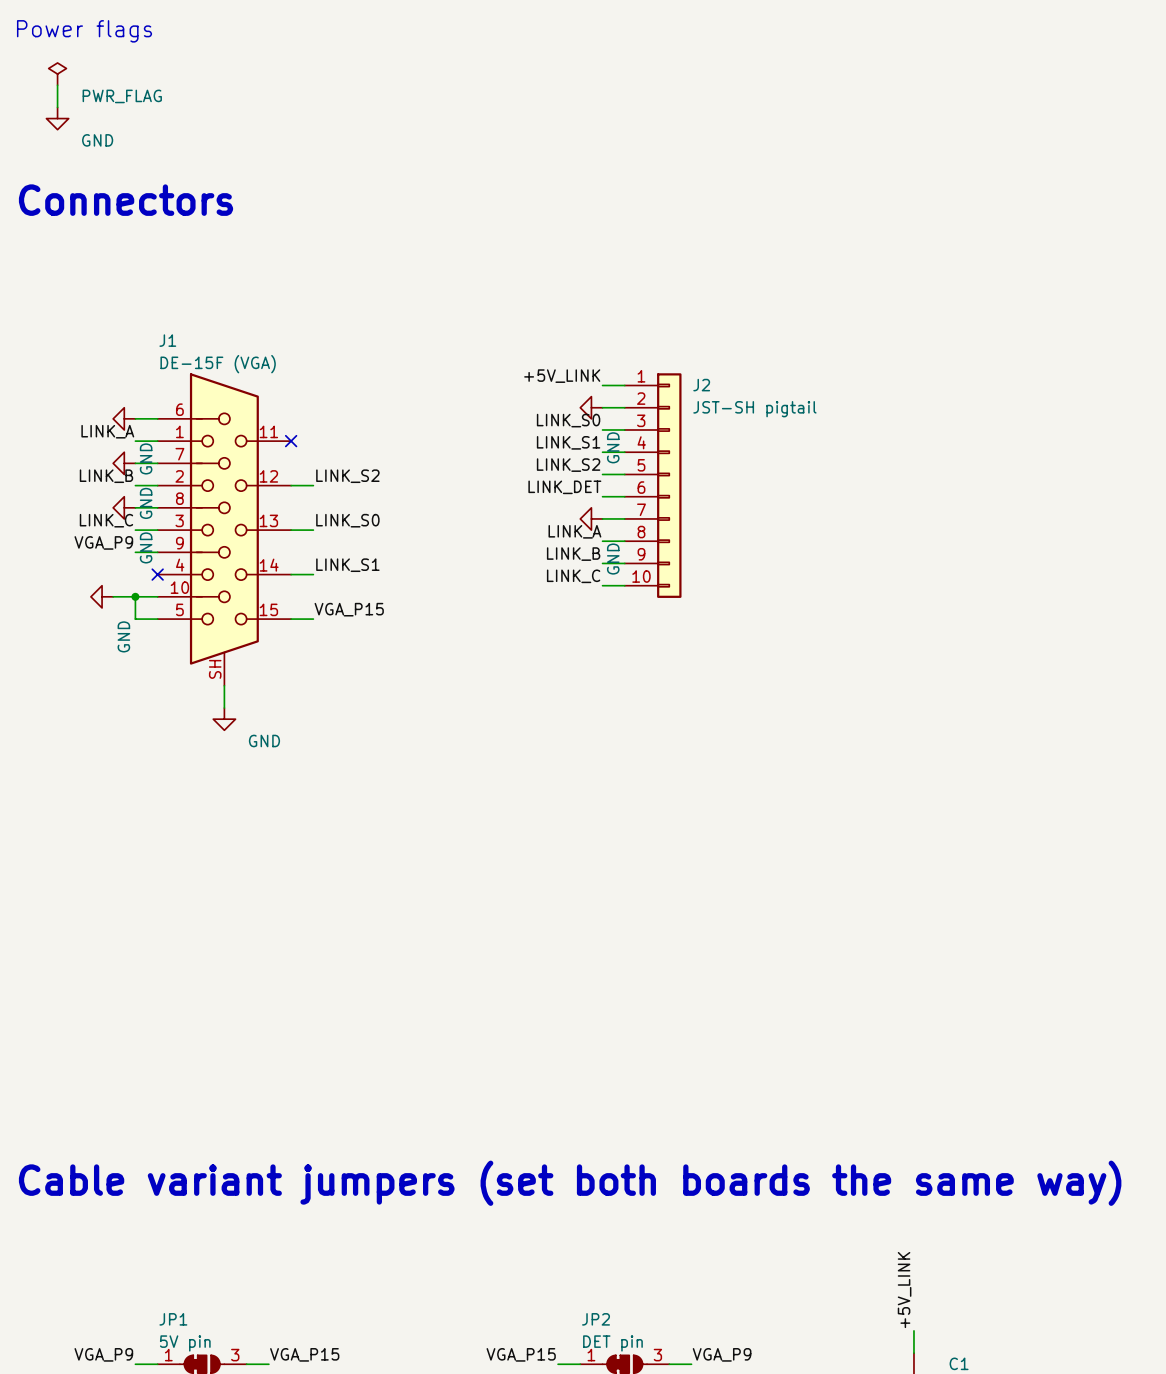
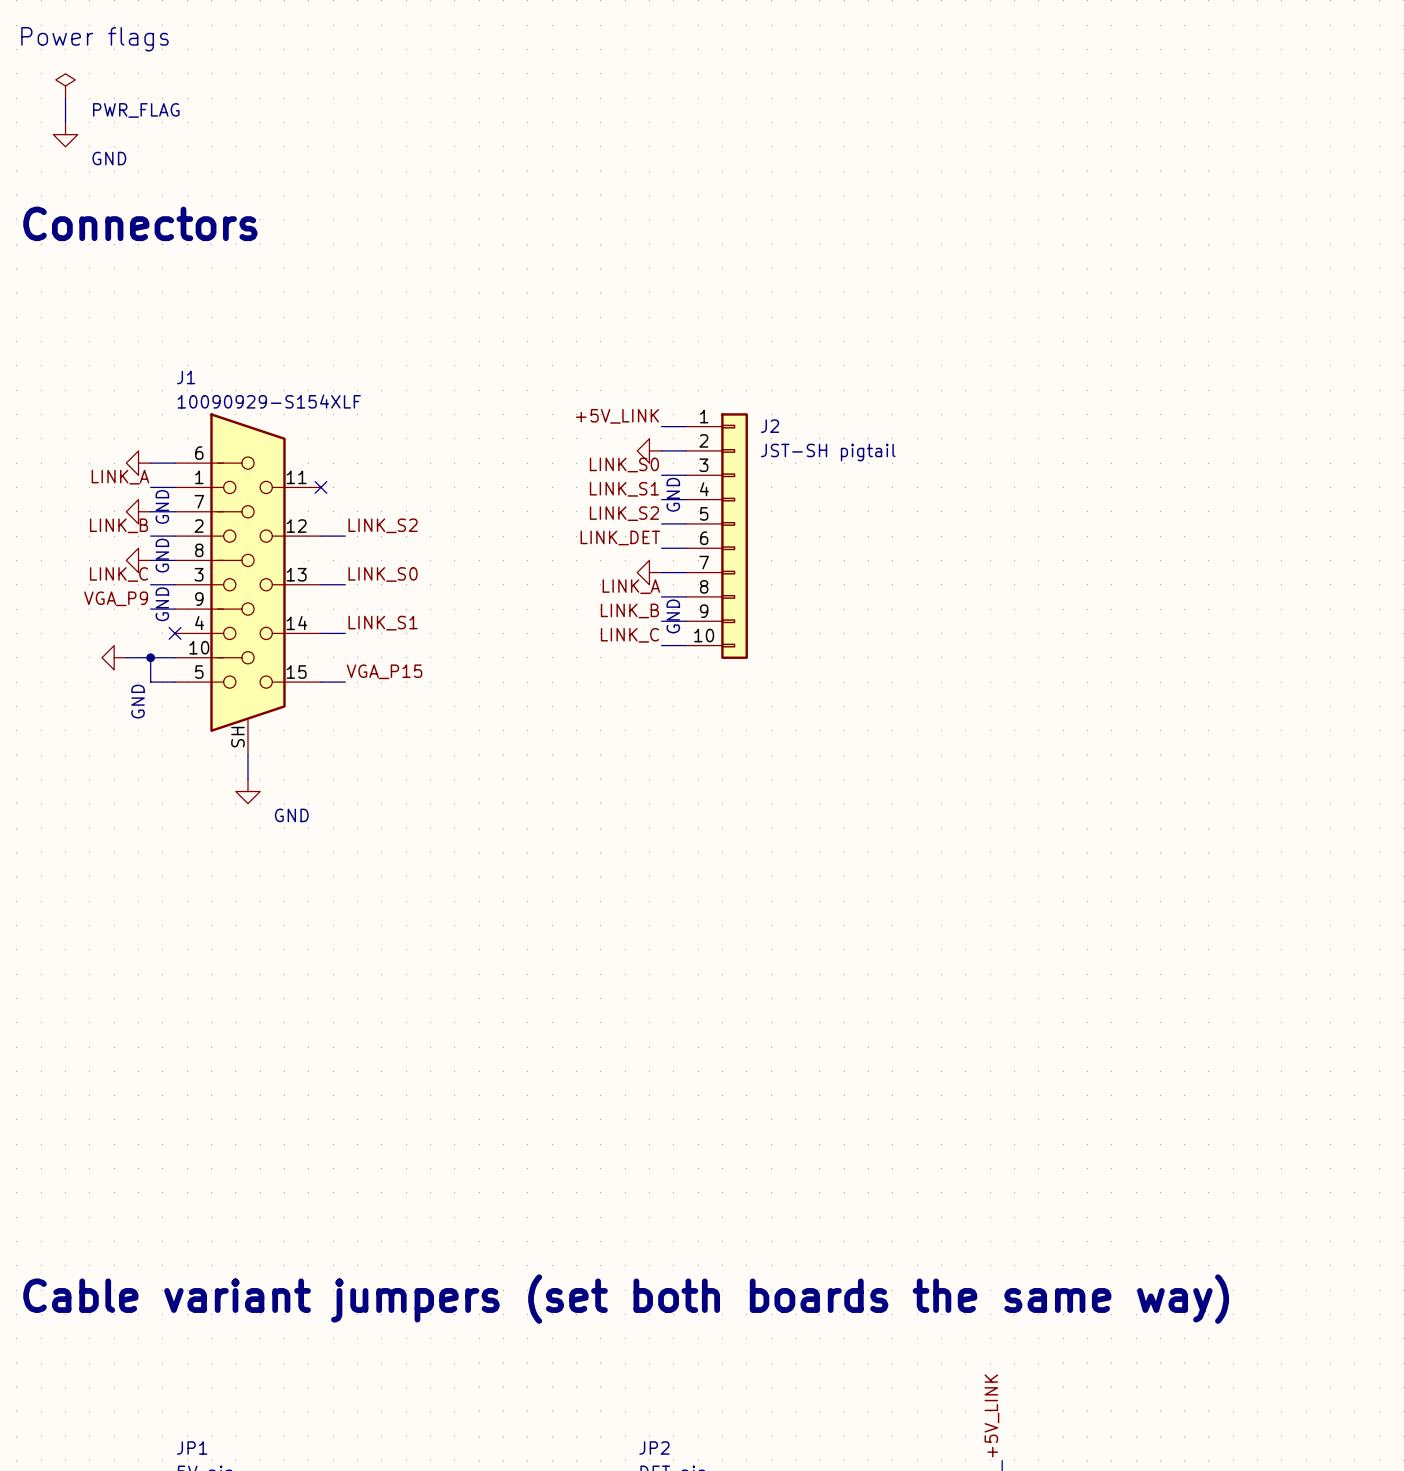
J1 value: DE-15F (VGA) (218, 364) -> 10090929-S154XLF (269, 401)

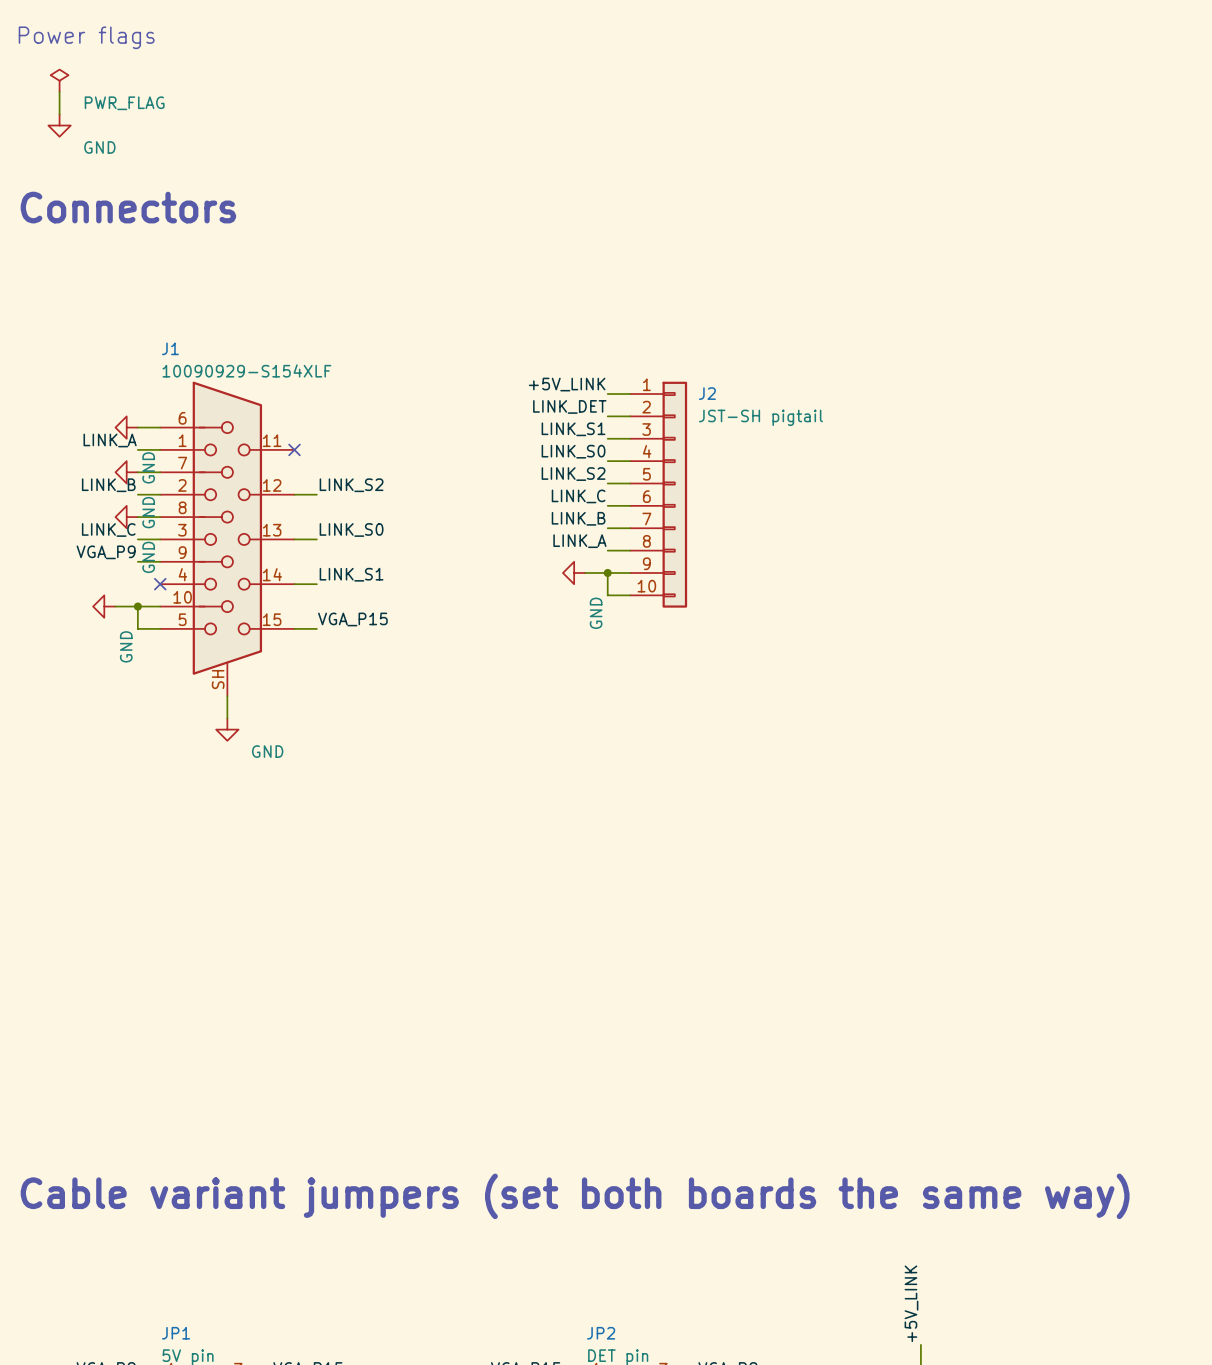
label: none -> LINK_DET (569, 406)
power symbol: GND (649, 450) -> none
label: LINK_S0 (624, 464) -> LINK_S1 (573, 429)
label: LINK_S1 (624, 489) -> LINK_S0 (573, 451)
label: LINK_DET (620, 537) -> LINK_C (578, 496)
power symbol position: GND (649, 572) -> GND (574, 572)
label position: LINK_B (629, 610) -> LINK_B (578, 518)
wire: none -> (585, 572) (607, 572) (607, 595)
junction: none -> (607, 572)
label: LINK_C (629, 635) -> none

